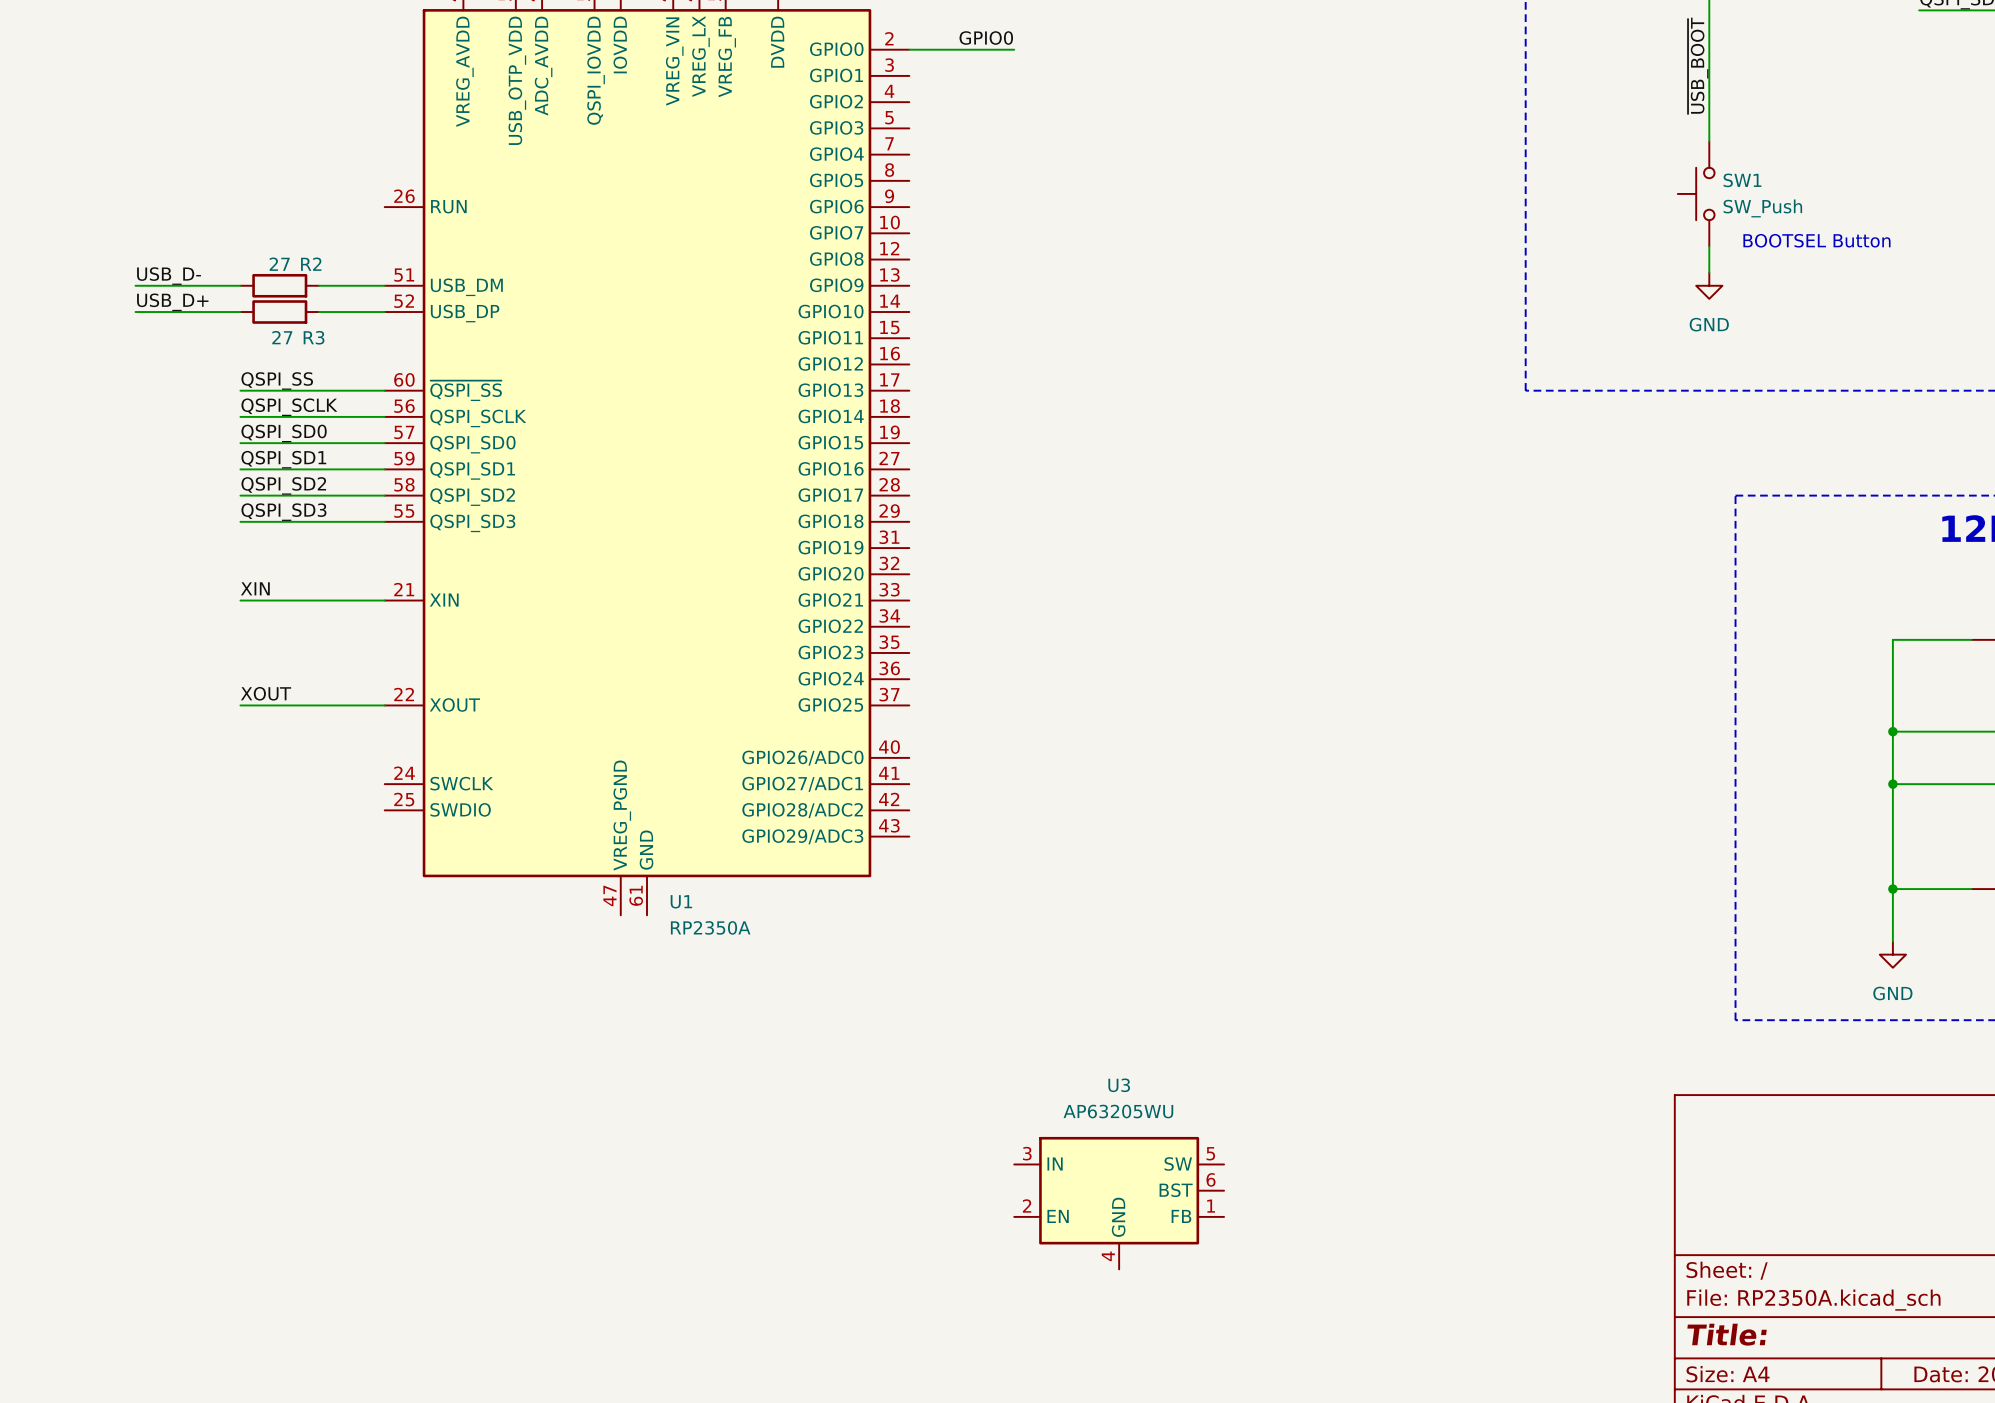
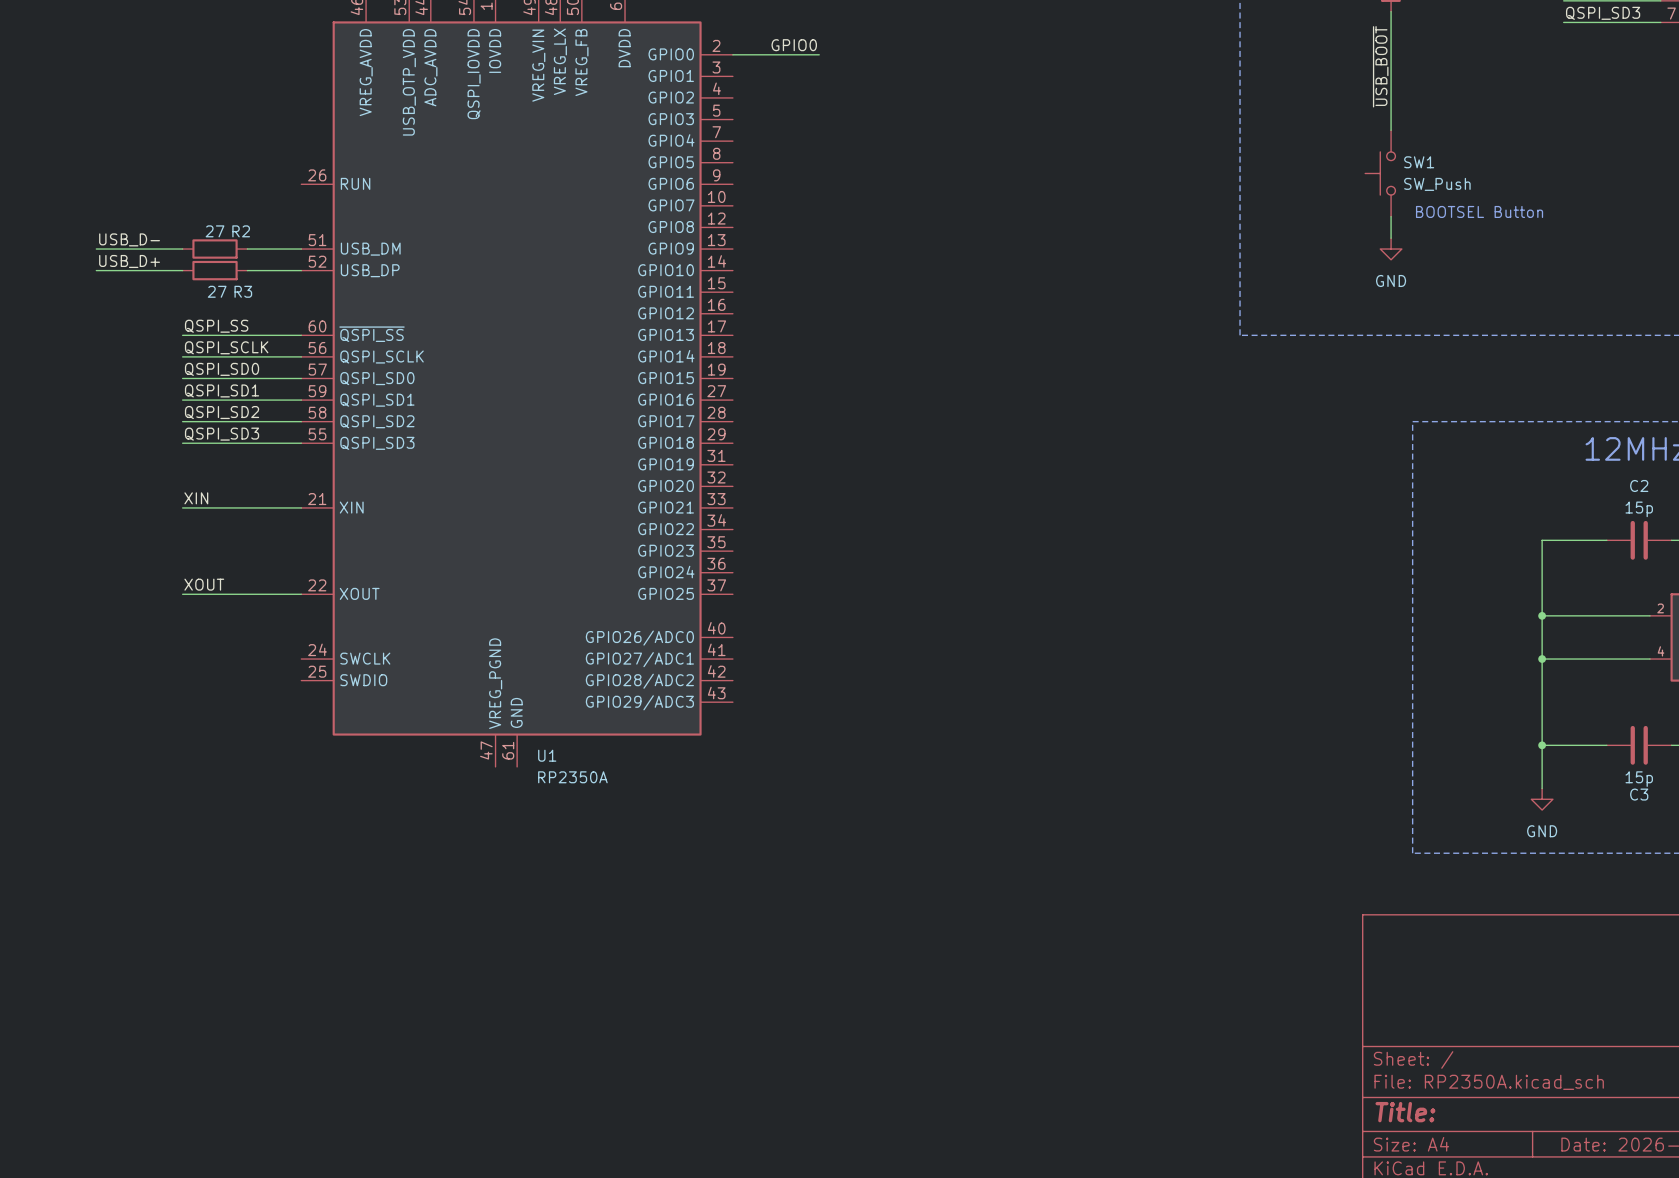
U3: AP63205WU (1119, 1203) -> none

